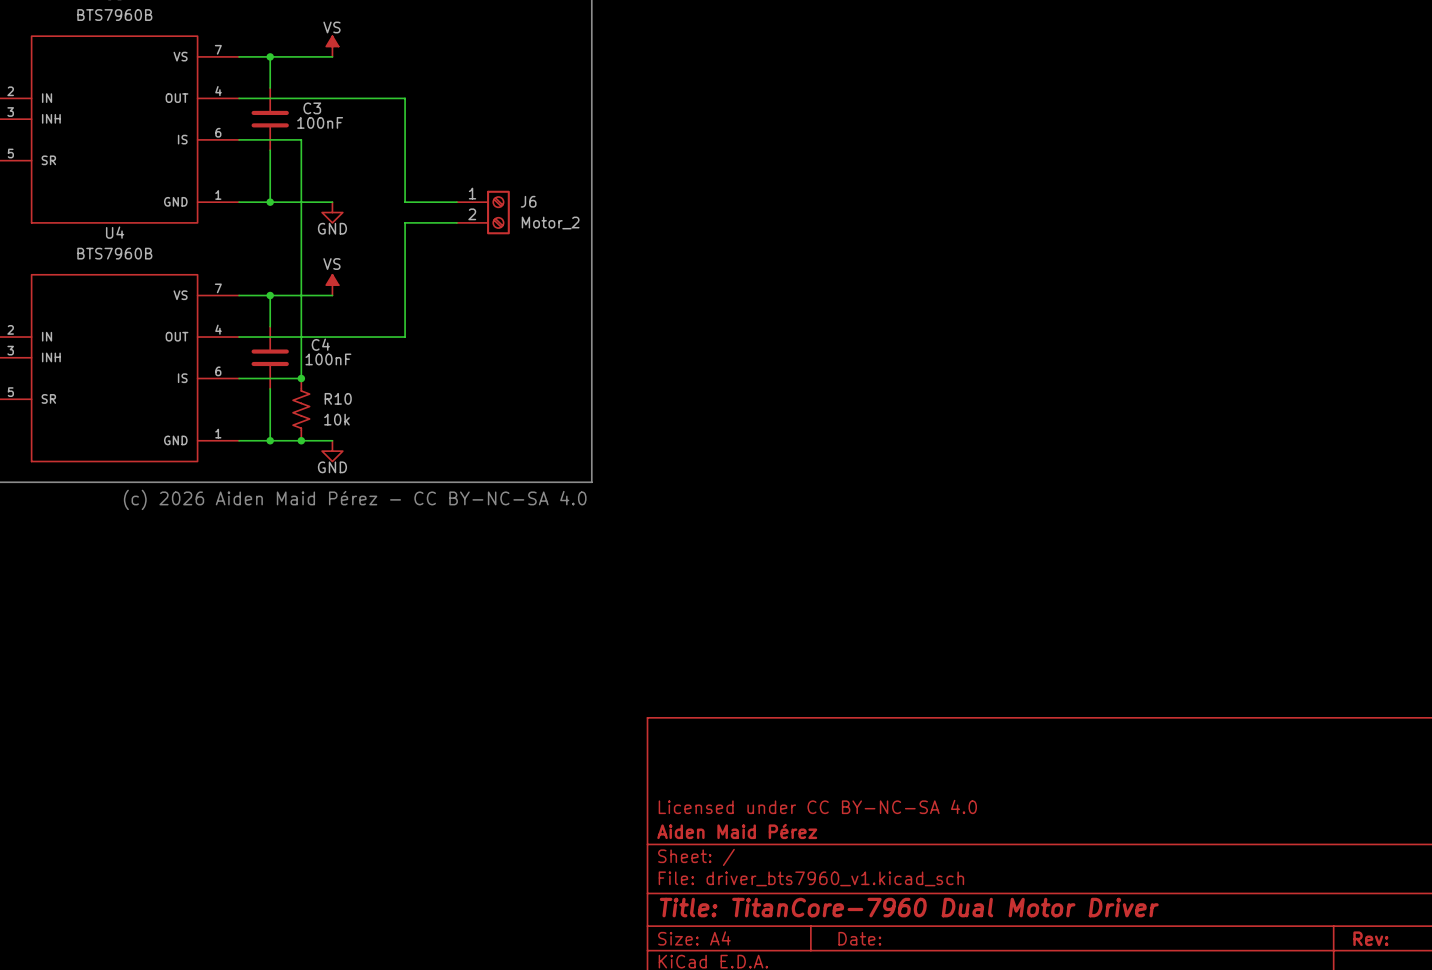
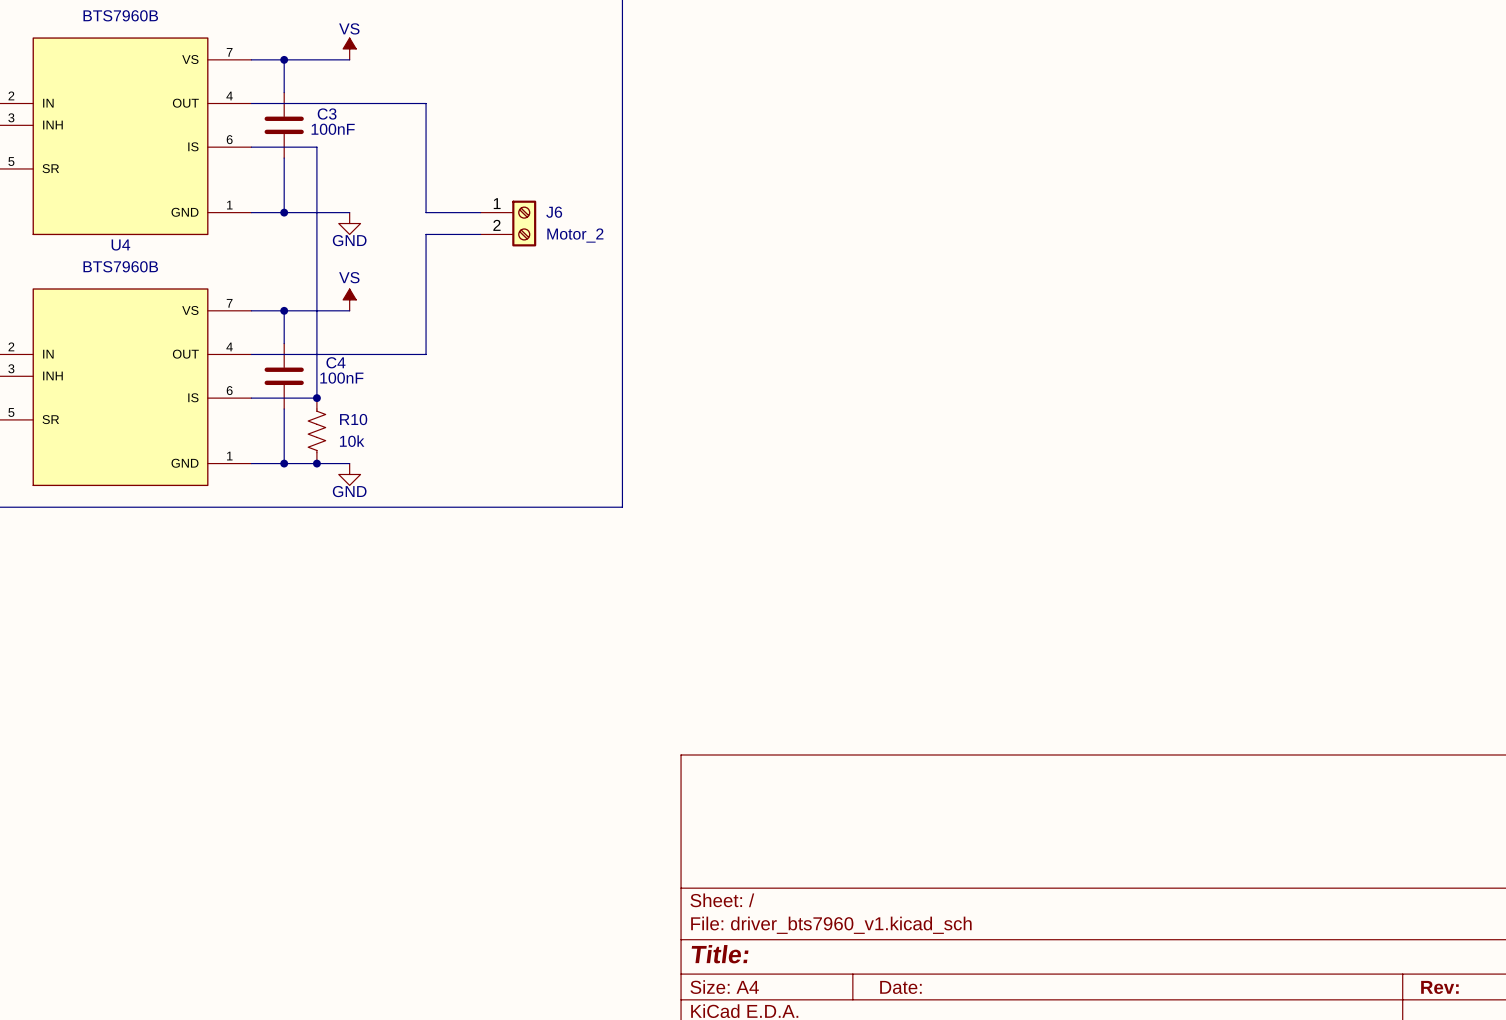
text: (c) 2026 Aiden Maid Pérez - CC BY-NC-SA 4.0 (355, 499) -> none
title block: Licensed under CC BY-NC-SA 4.0 (817, 806) -> none
title block: Aiden Maid Pérez (737, 831) -> none
title block: Title: TitanCore-7960 Dual Motor Driver (909, 907) -> Title: (720, 954)

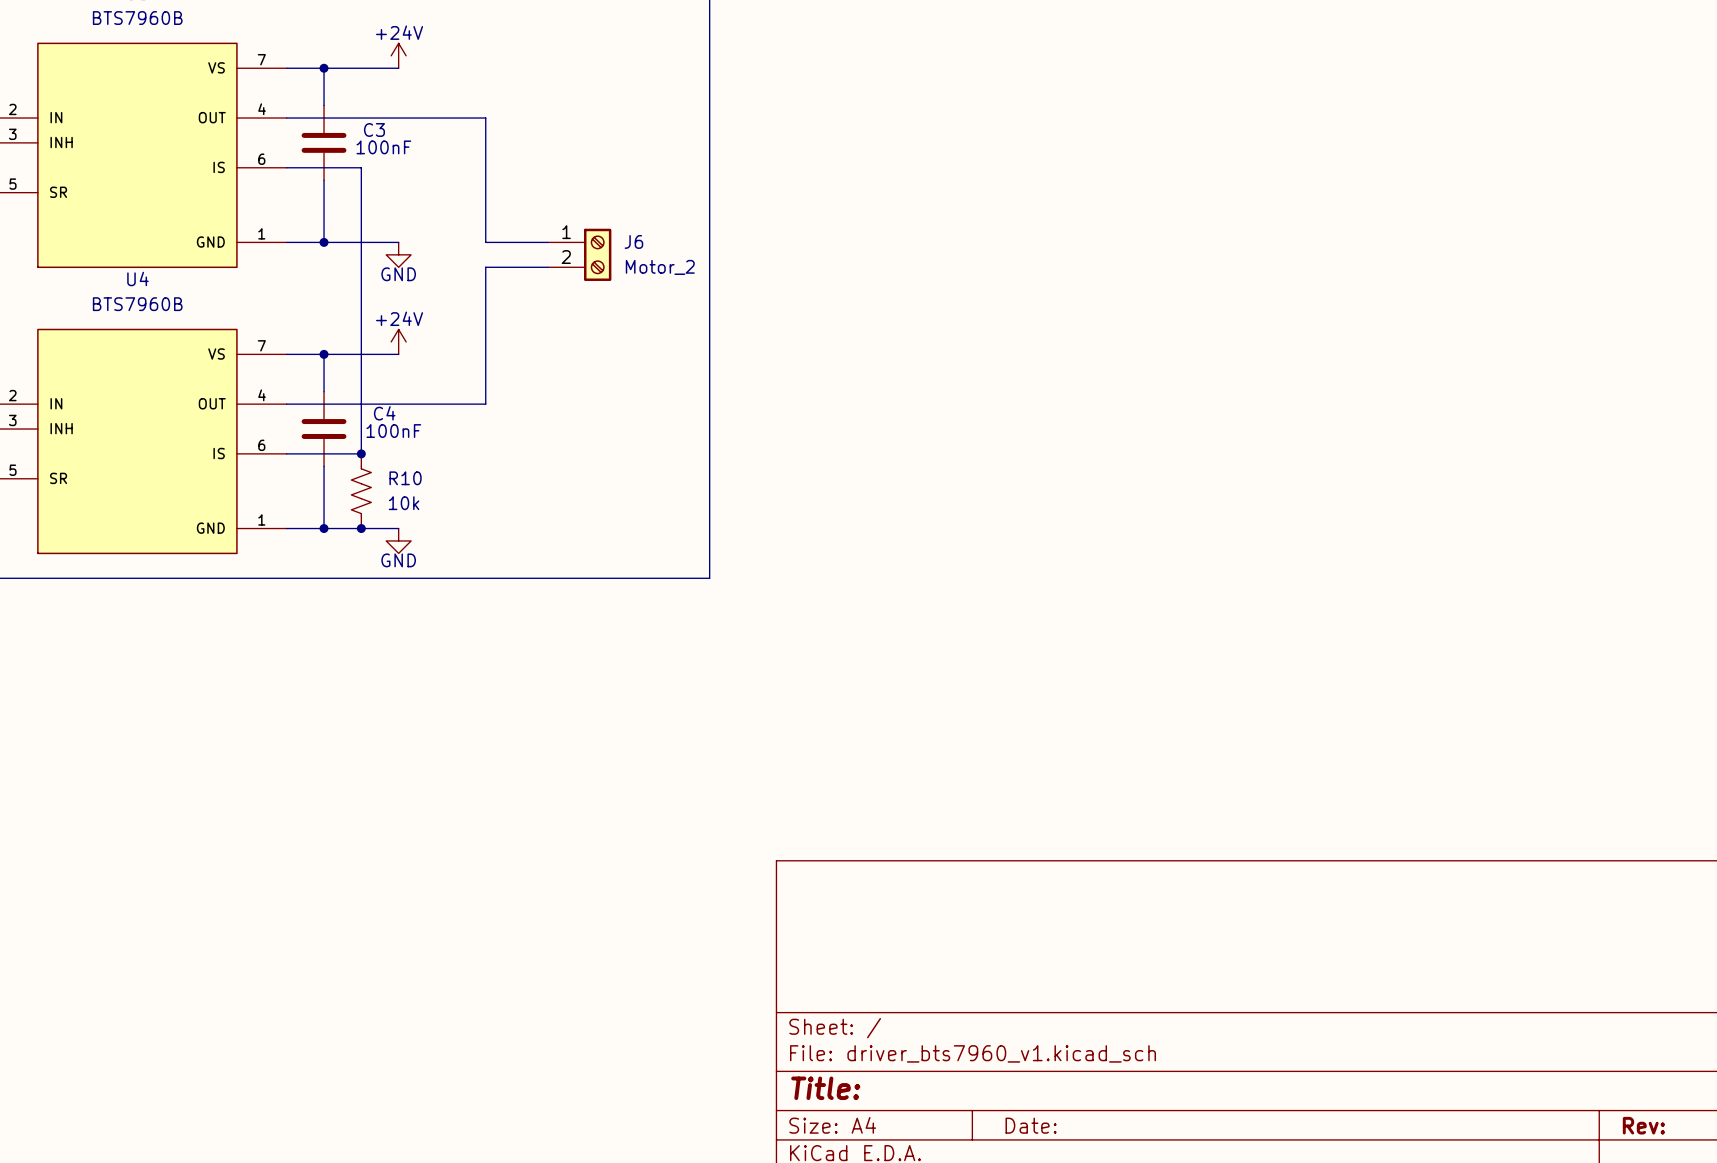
power symbol: VS (349, 48) -> +24V (398, 55)
power symbol: VS (349, 299) -> +24V (398, 341)

